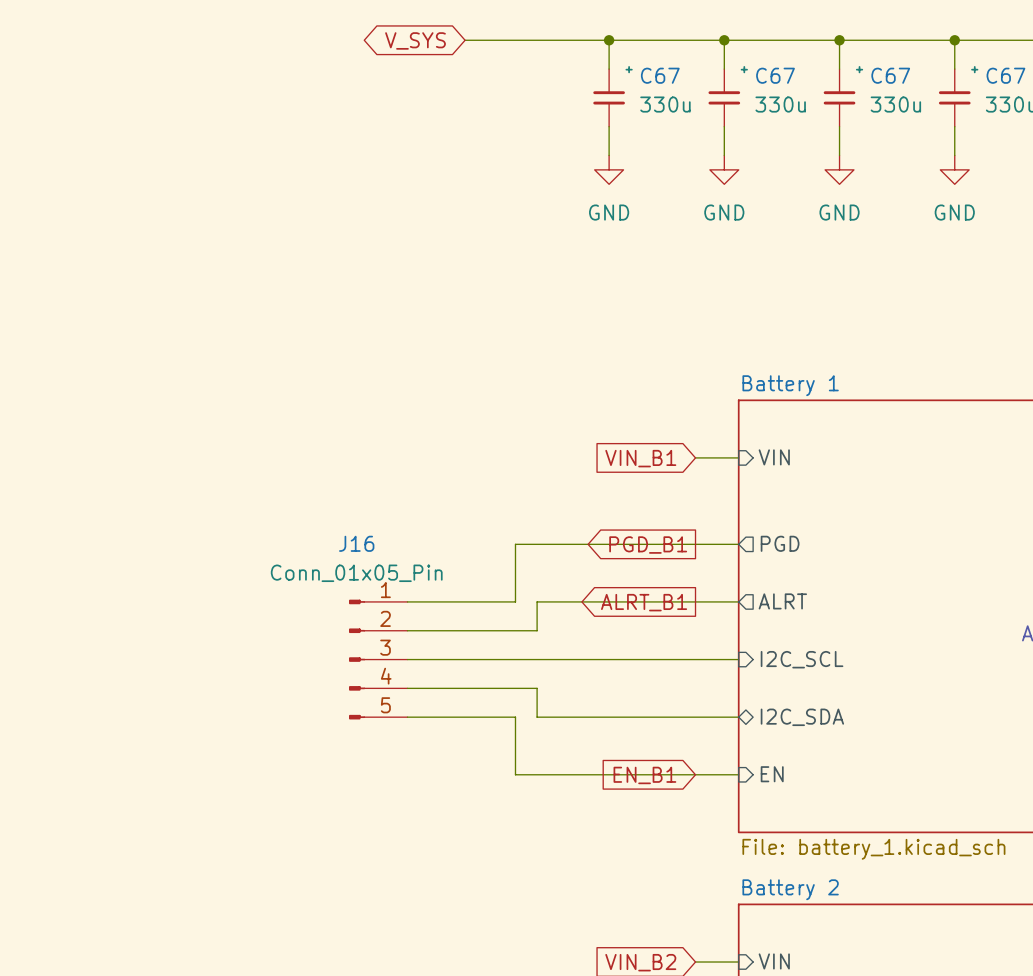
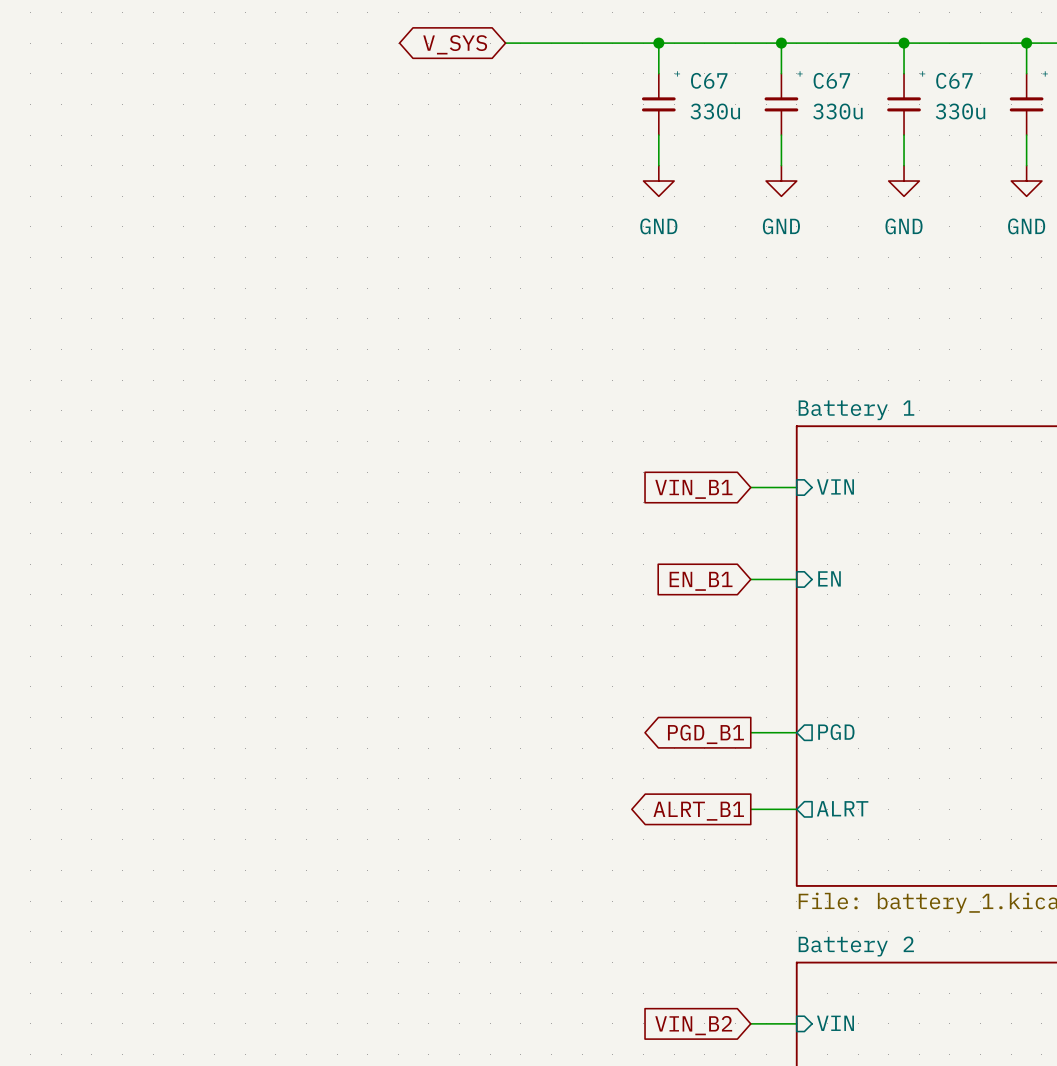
sheet pin shape: output (780, 543) -> input (829, 578)
sheet pin: PGD (780, 543) -> EN (829, 578)
wire: (695, 544) (515, 544) (515, 601) (407, 601) -> none
global label shape: output (648, 545) -> input (701, 581)
global label: PGD_B1 (648, 545) -> EN_B1 (701, 581)
wire: (738, 601) (537, 601) (537, 630) (407, 630) -> none
sheet pin position: ALRT (782, 601) -> ALRT (842, 808)
global label position: ALRT_B1 (644, 602) -> ALRT_B1 (698, 811)
J16: Conn_01x05_Pin (378, 659) -> none
wire: (407, 659) (738, 659) -> none
sheet pin: I2C_SCL (802, 659) -> none
sheet pin: none -> PGD (836, 732)
wire: (407, 688) (537, 688) (537, 717) (738, 717) -> none
wire: none -> (750, 732) (796, 732)
global label: none -> PGD_B1 (705, 734)
wire: (407, 717) (515, 717) (515, 774) (738, 774) -> none
sheet pin: I2C_SDA (802, 717) -> none
wire: none -> (750, 809) (796, 809)
sheet pin: EN (772, 774) -> none
global label: EN_B1 (644, 775) -> none

